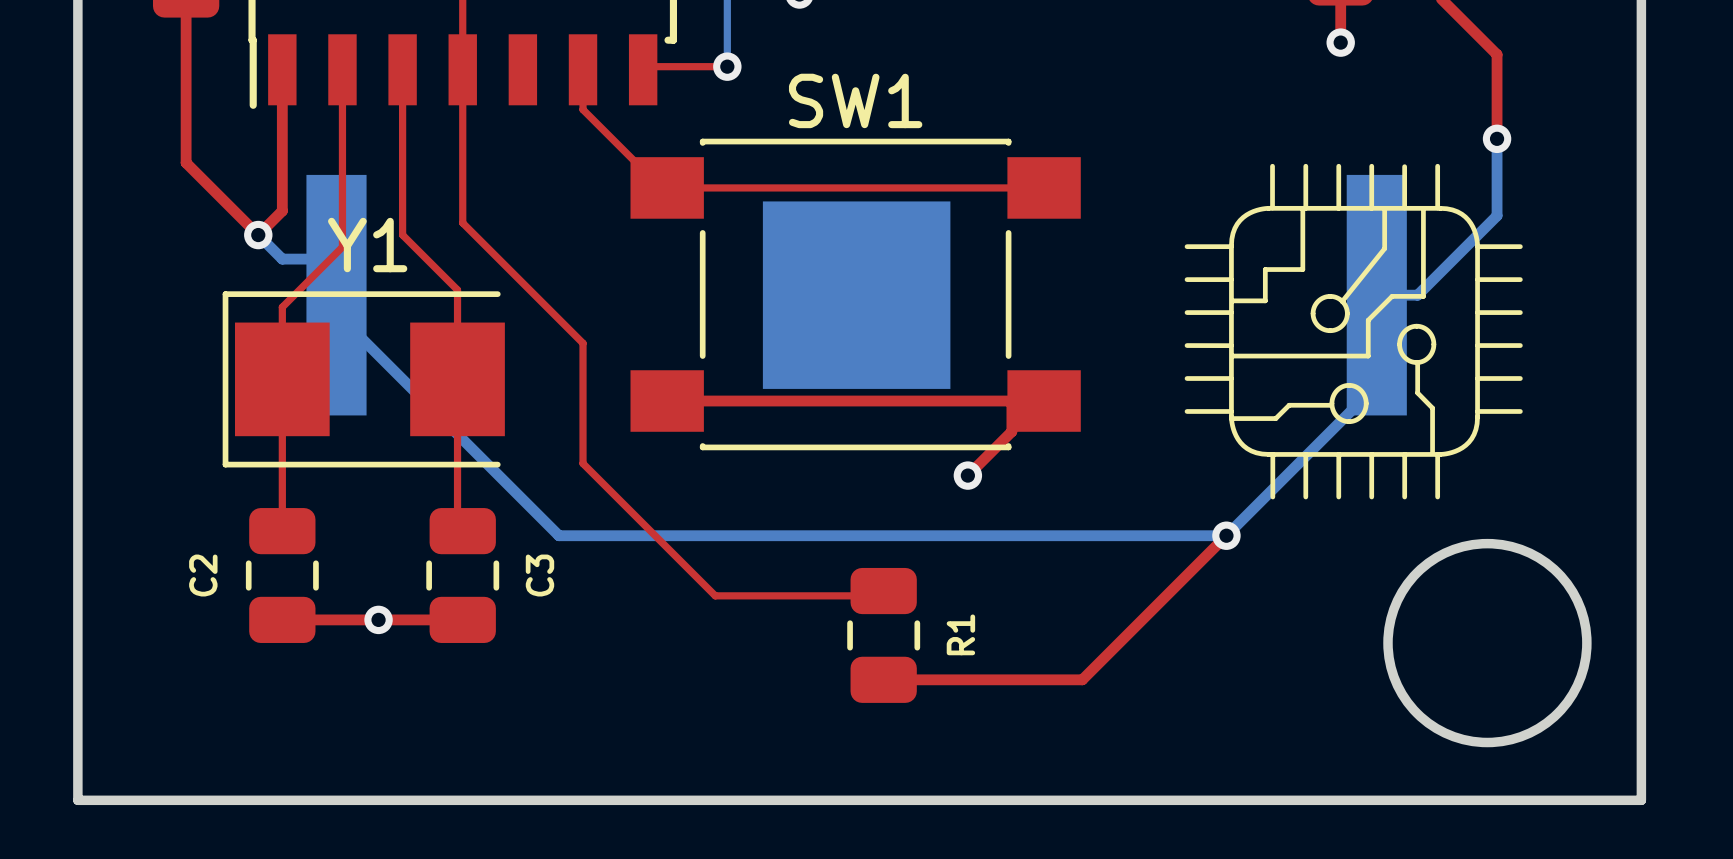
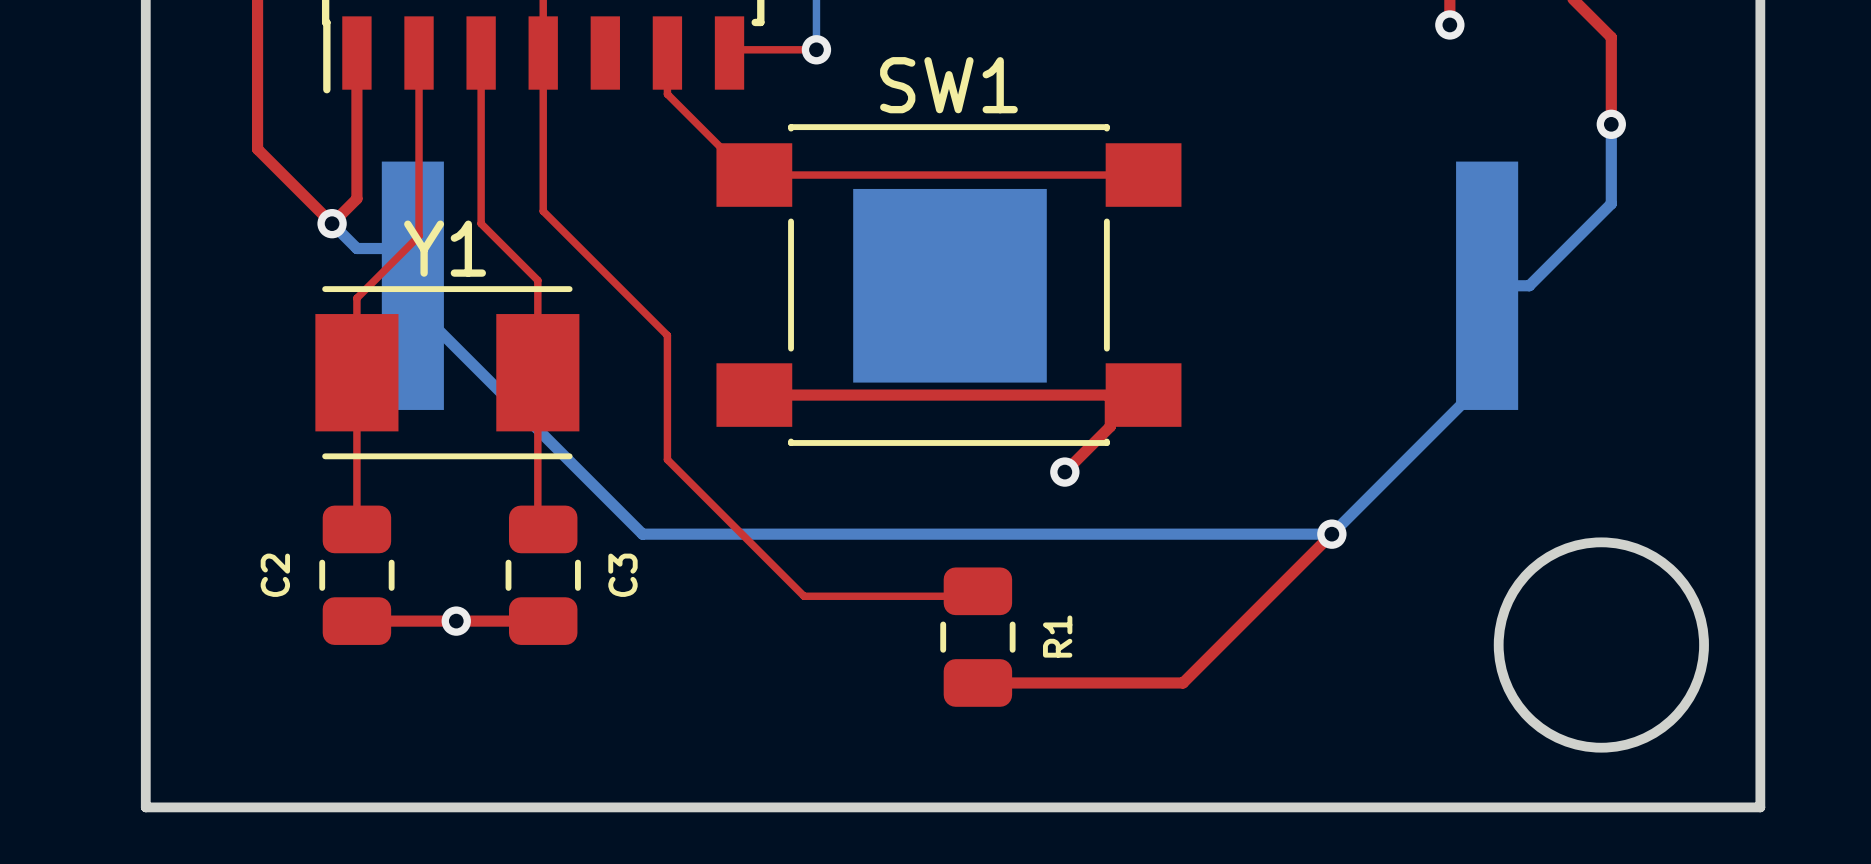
drawing: [1184, 163, 1523, 500] -> none
Y1 footprint: [222, 291, 505, 468] -> [315, 286, 580, 460]

